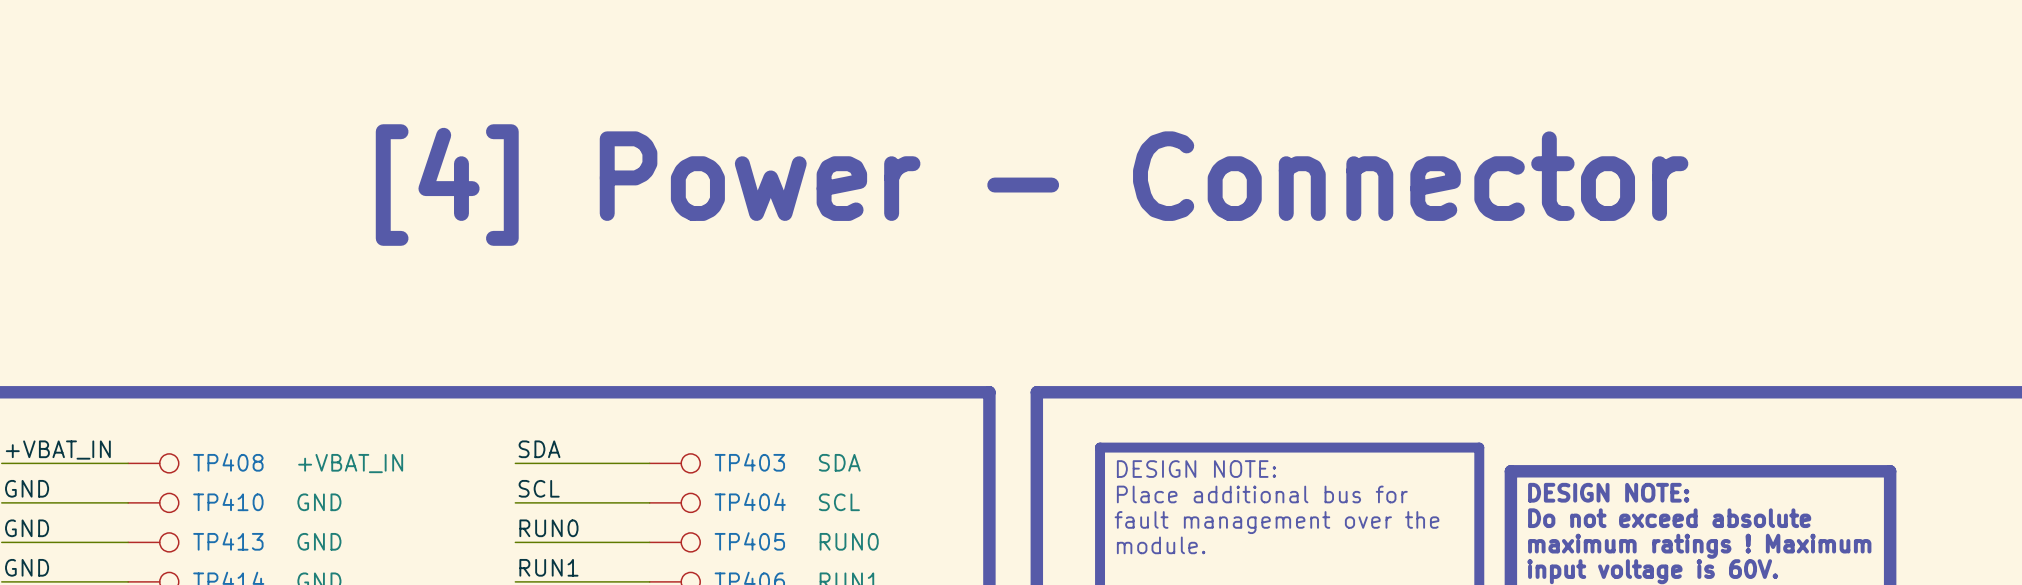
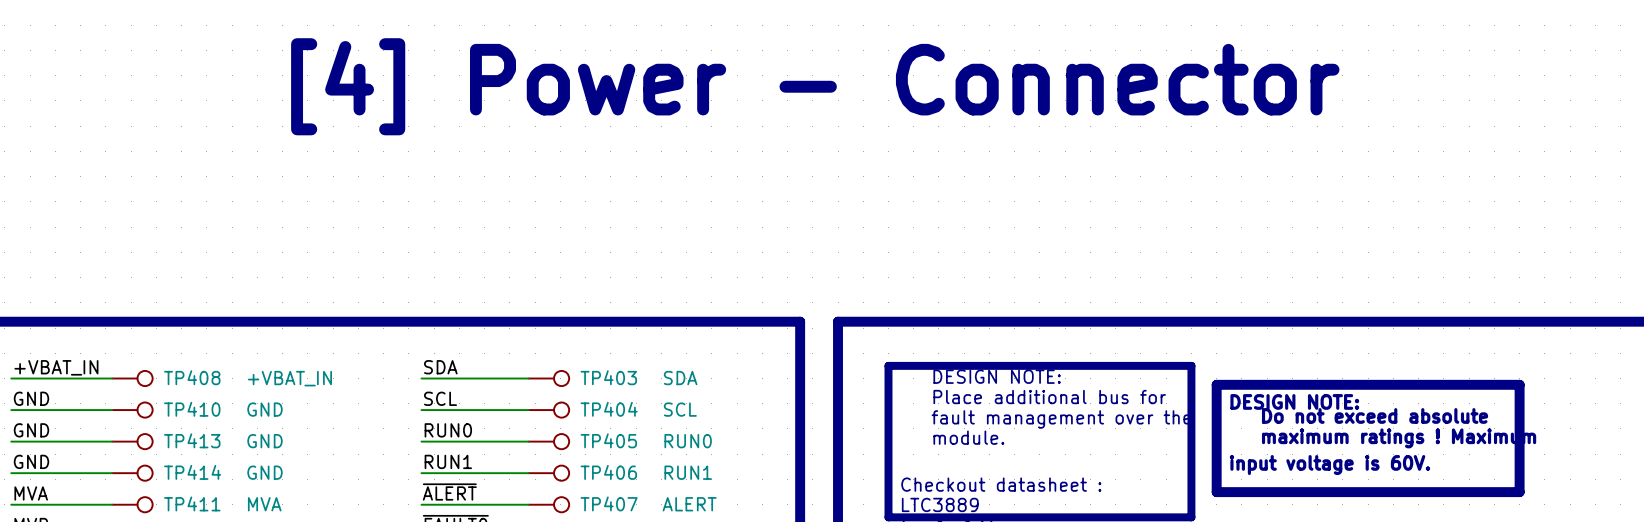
text position: [4] Power - Connector (1032, 185) -> [4] Power - Connector (815, 86)
text position: DESIGN NOTE: (1196, 469) -> DESIGN NOTE: (997, 376)
text position: Place additional bus for (1262, 494) -> Place additional bus for (1049, 397)
text position: Do not exceed absolute (1669, 518) -> Do not exceed absolute (1375, 415)
text position: fault management over the (1276, 522) -> fault management over the (1061, 419)
text position: module. (1161, 545) -> module. (968, 437)
text position: maximum ratings ! Maximum (1699, 546) -> maximum ratings ! Maximum (1399, 438)

